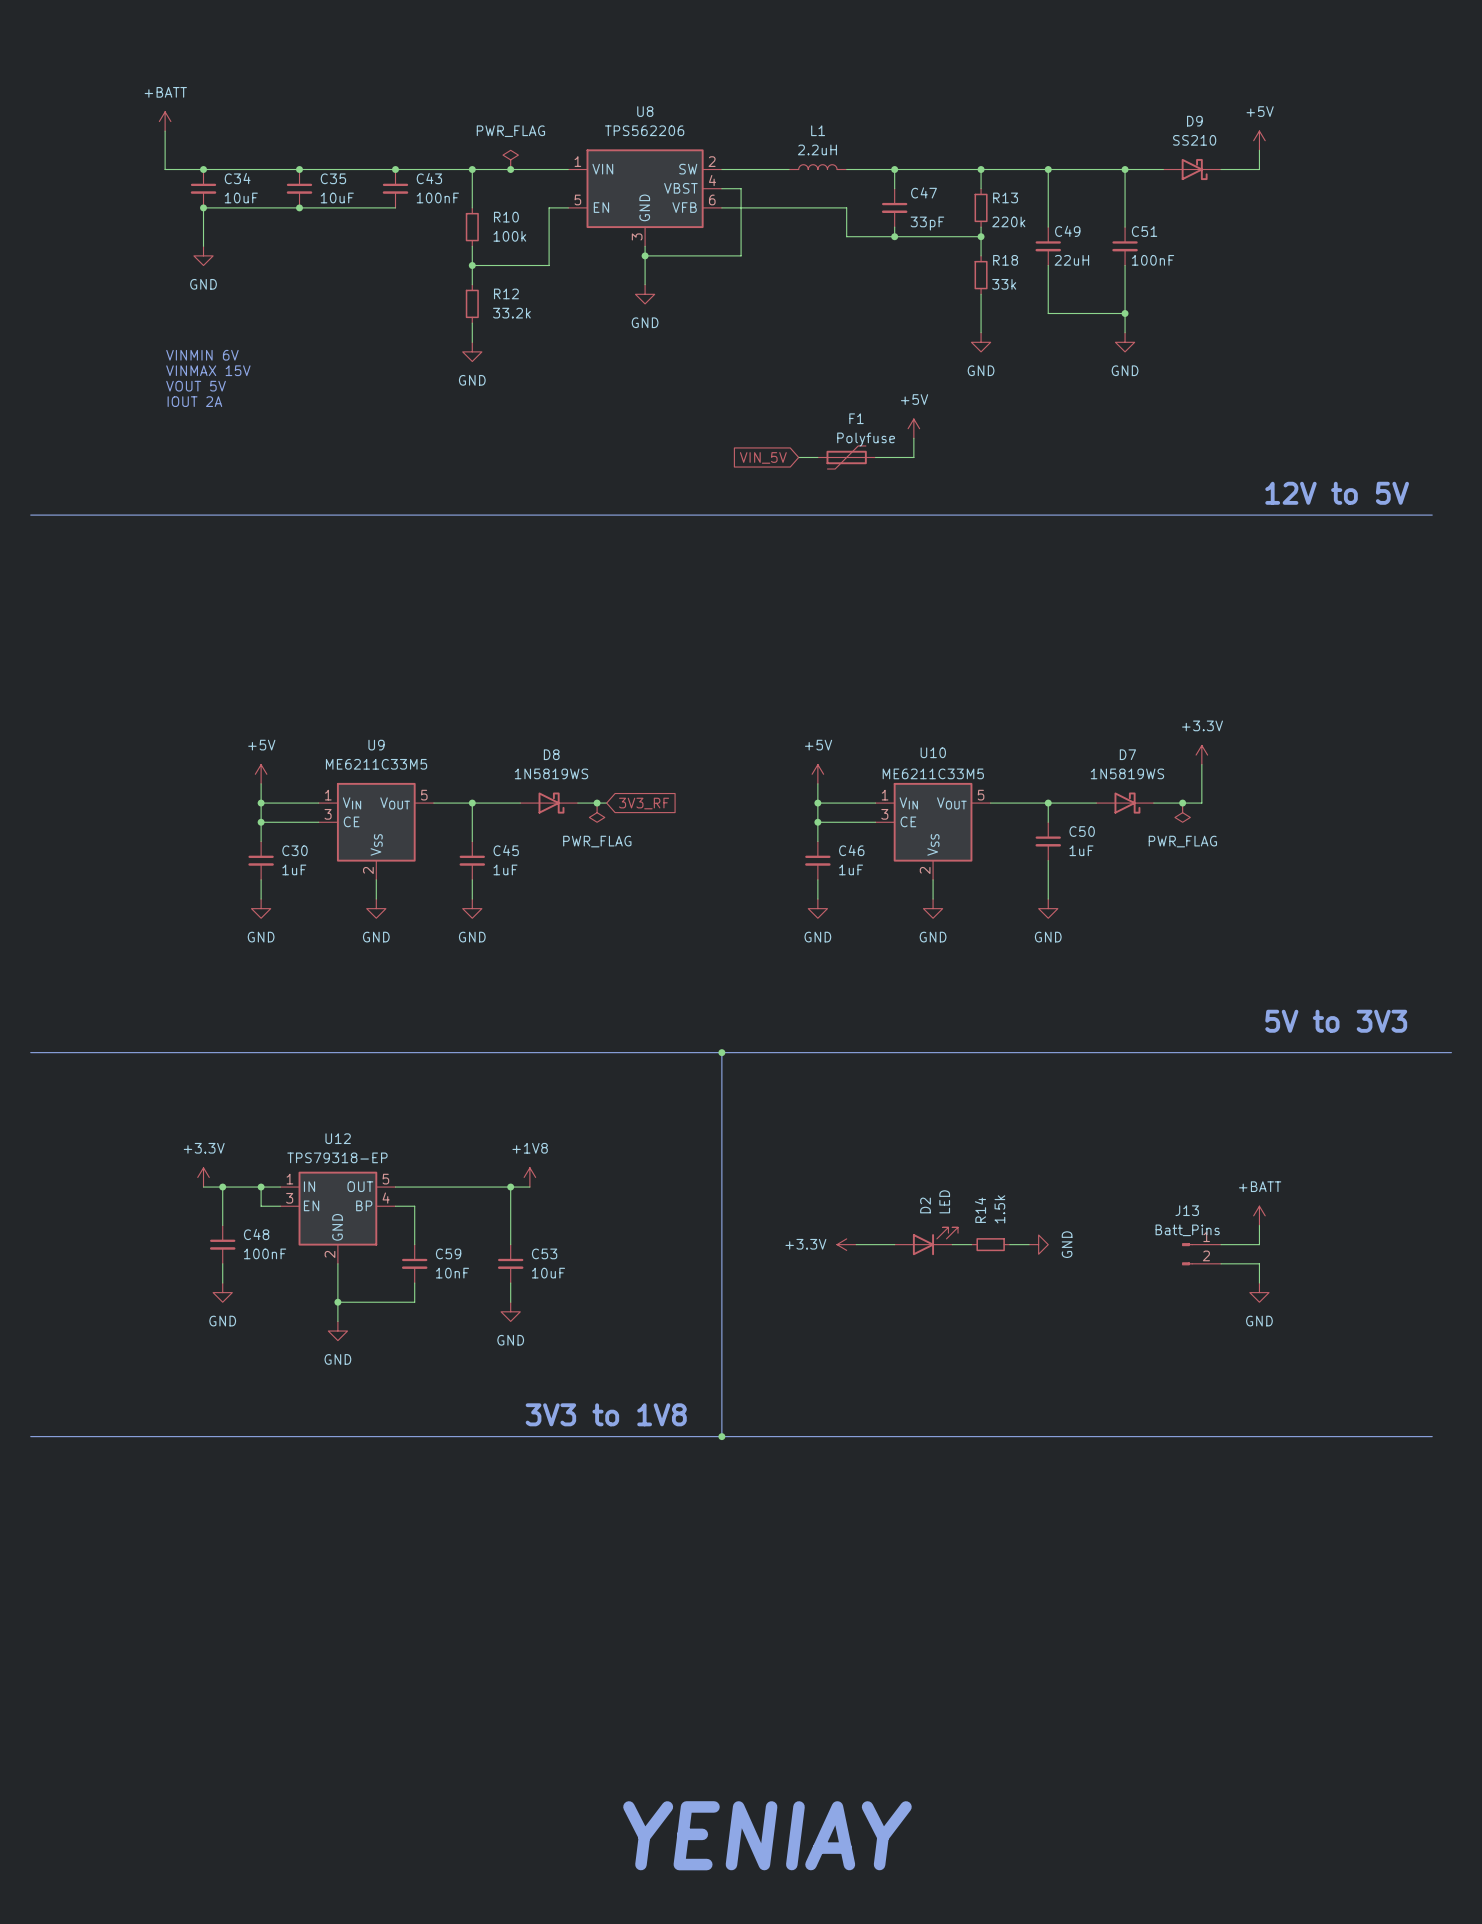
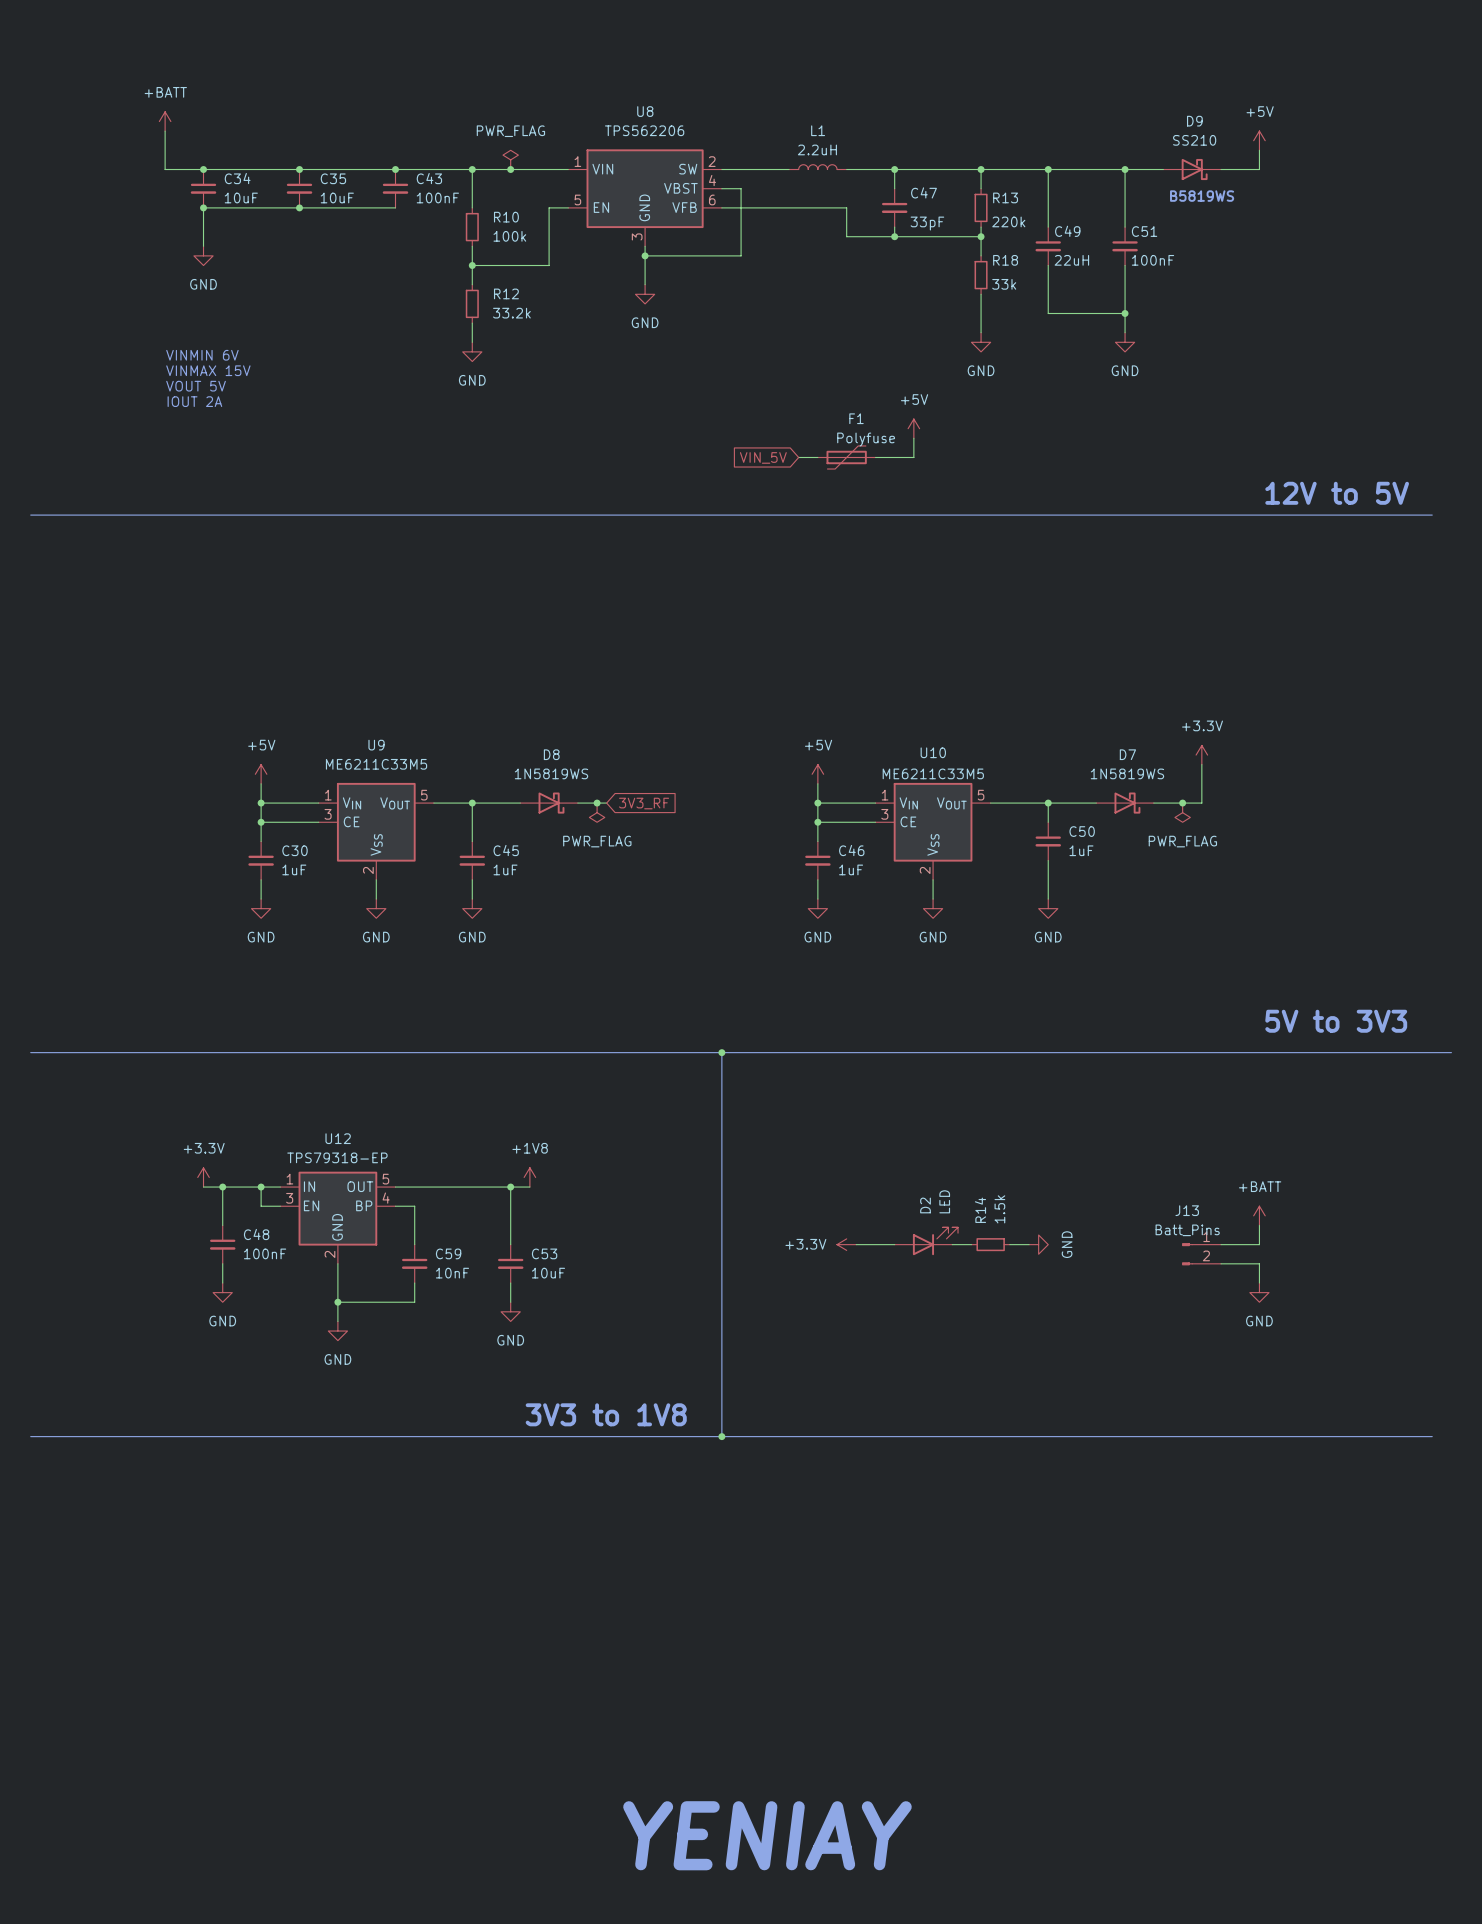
text: none -> B5819WS (1202, 196)

